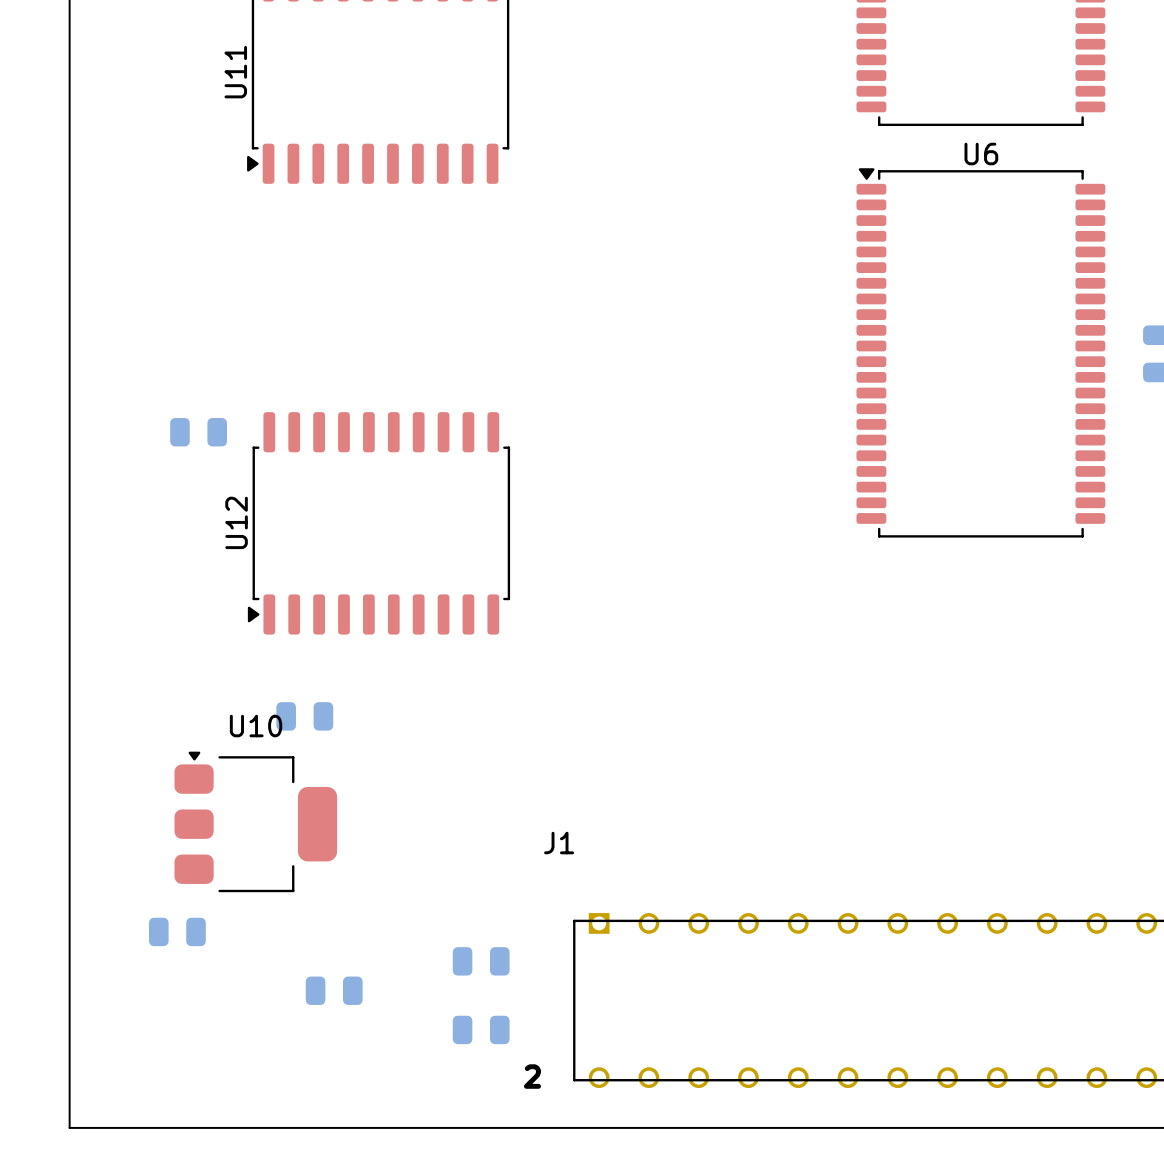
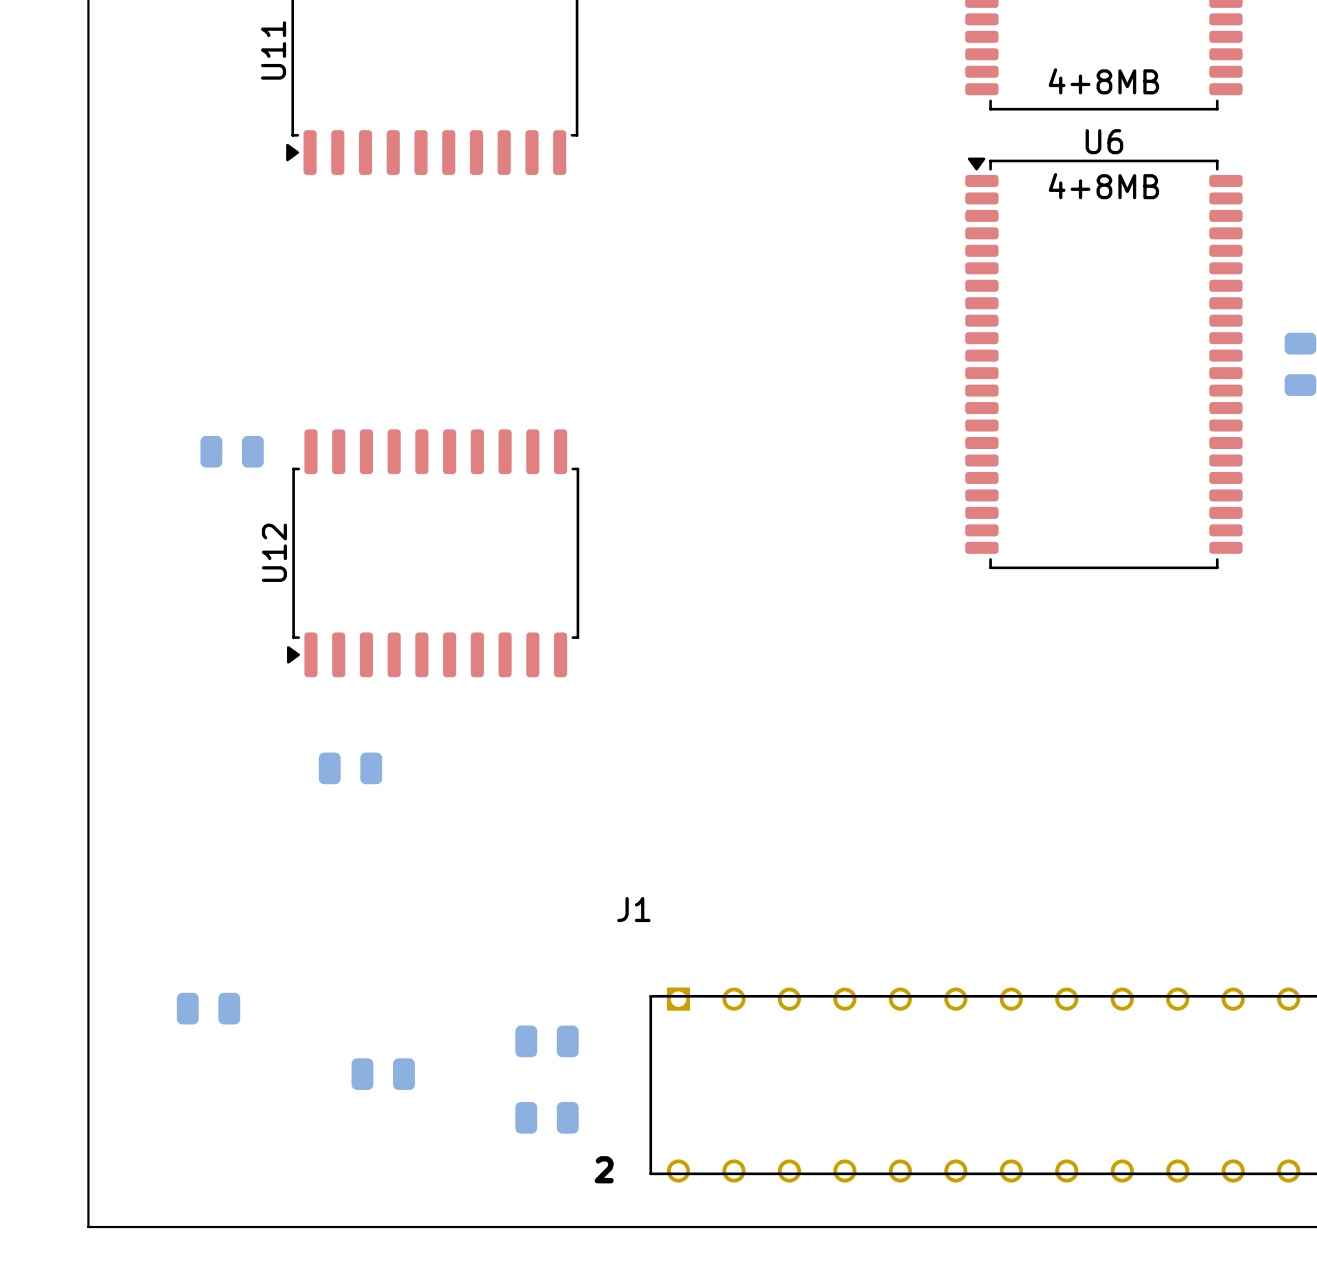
text: none -> 4+8MB (1103, 81)
text: none -> 4+8MB (1103, 186)
U10: (255, 821) -> none

